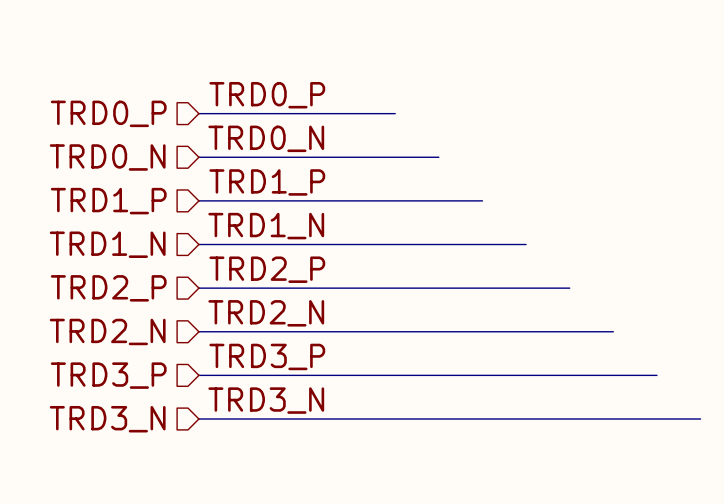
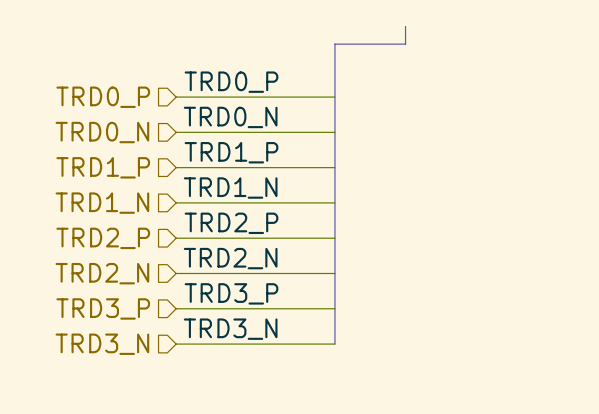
bus: none -> (405, 26) (405, 44) (334, 44) (334, 344)
wire: (395, 157) (438, 157) -> none
wire: (395, 200) (482, 200) -> none
wire: (395, 244) (526, 244) -> none
wire: (395, 288) (569, 288) -> none
wire: (395, 331) (613, 331) -> none
wire: (395, 375) (656, 375) -> none
wire: (395, 419) (700, 419) -> none

